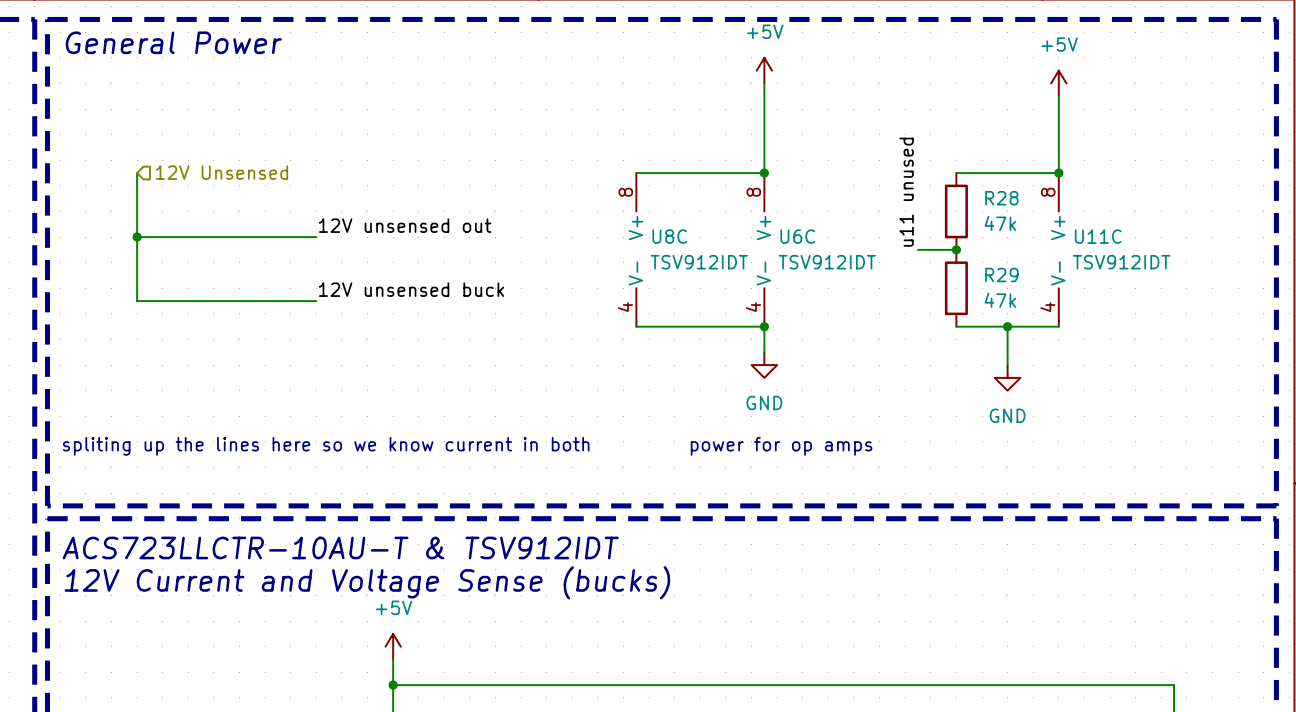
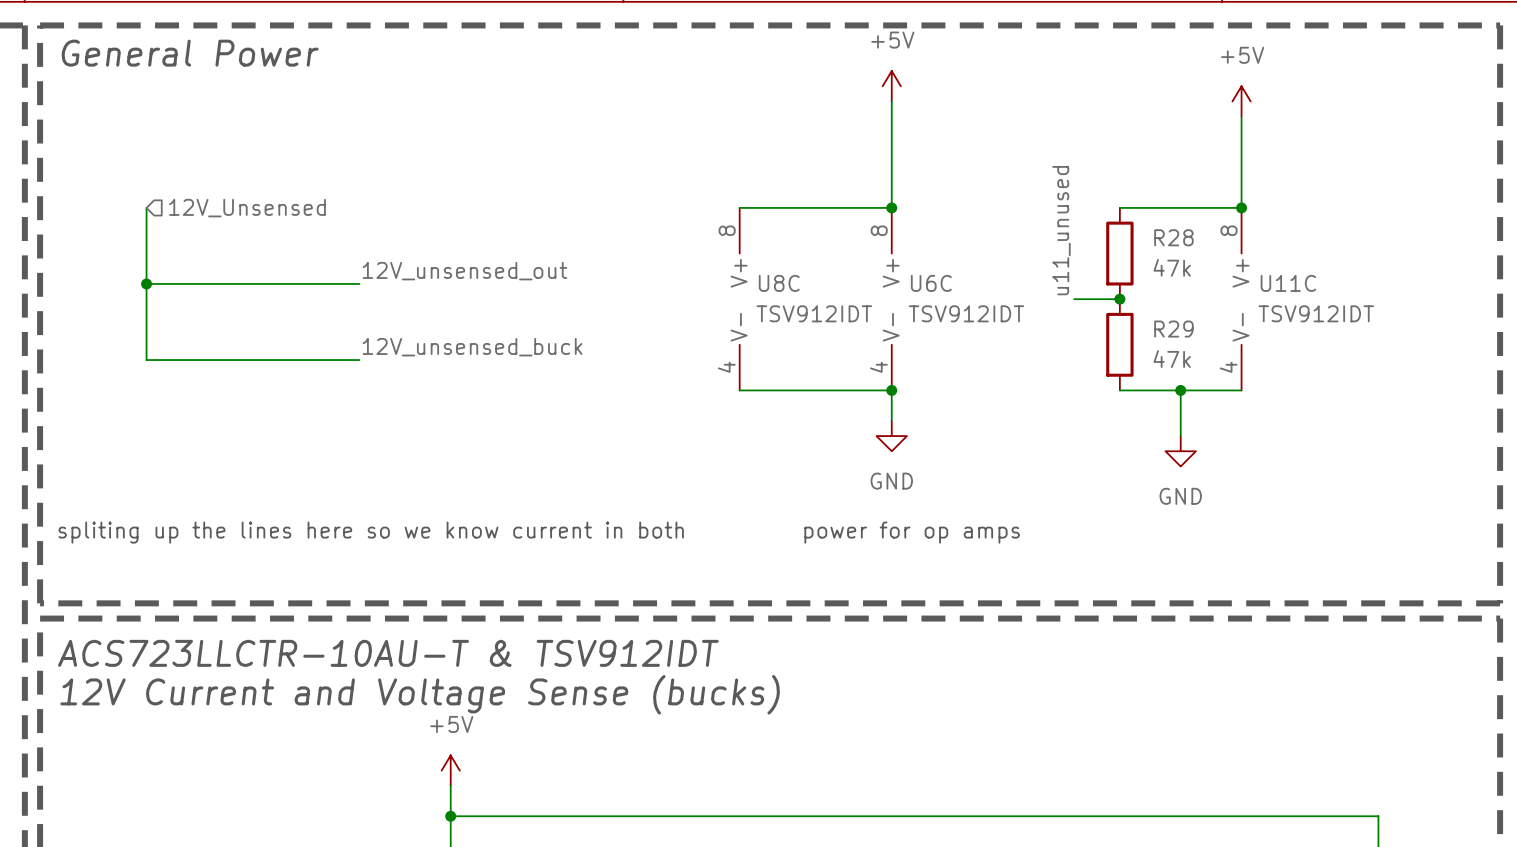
hierarchical label: 12V Unsensed (222, 172) -> 12V_Unsensed (247, 208)
label: u11 unused (906, 192) -> u11_unused (1061, 230)
label: 12V unsensed out (405, 225) -> 12V_unsensed_out (464, 271)
label: 12V unsensed buck (411, 289) -> 12V_unsensed_buck (472, 347)

